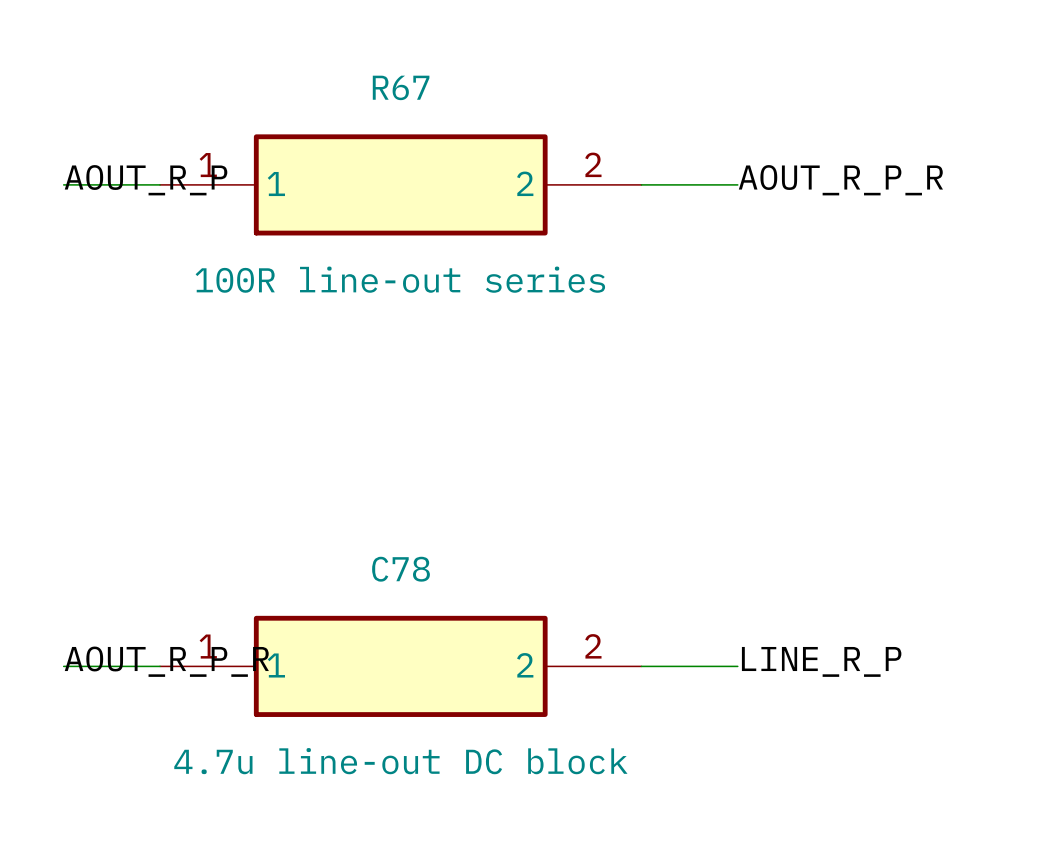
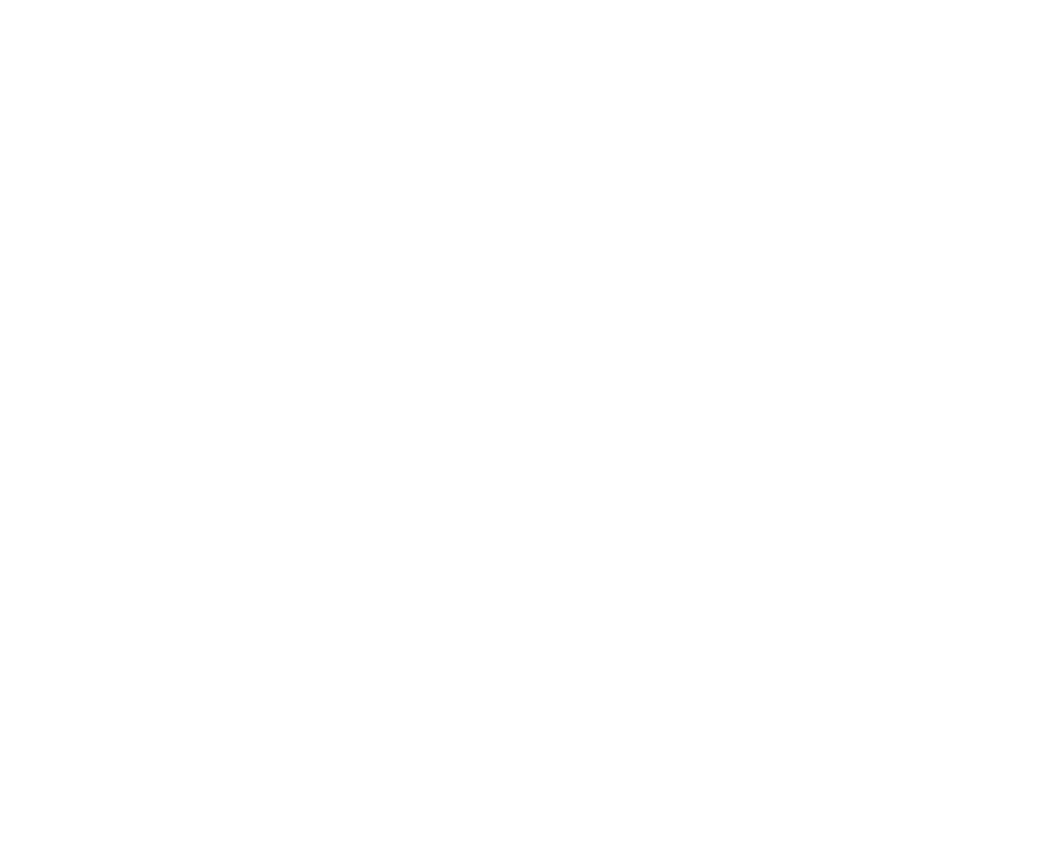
label: AOUT_R_P (146, 180) -> none
label: AOUT_R_P_R (840, 180) -> none
wire: (63, 184) (160, 184) -> none
R67: 100R line-out series (400, 184) -> none
wire: (641, 184) (737, 184) -> none
label: AOUT_R_P_R (166, 661) -> none
label: LINE_R_P (821, 661) -> none
wire: (63, 666) (160, 666) -> none
C78: 4.7u line-out DC block (400, 666) -> none
wire: (641, 666) (737, 666) -> none

